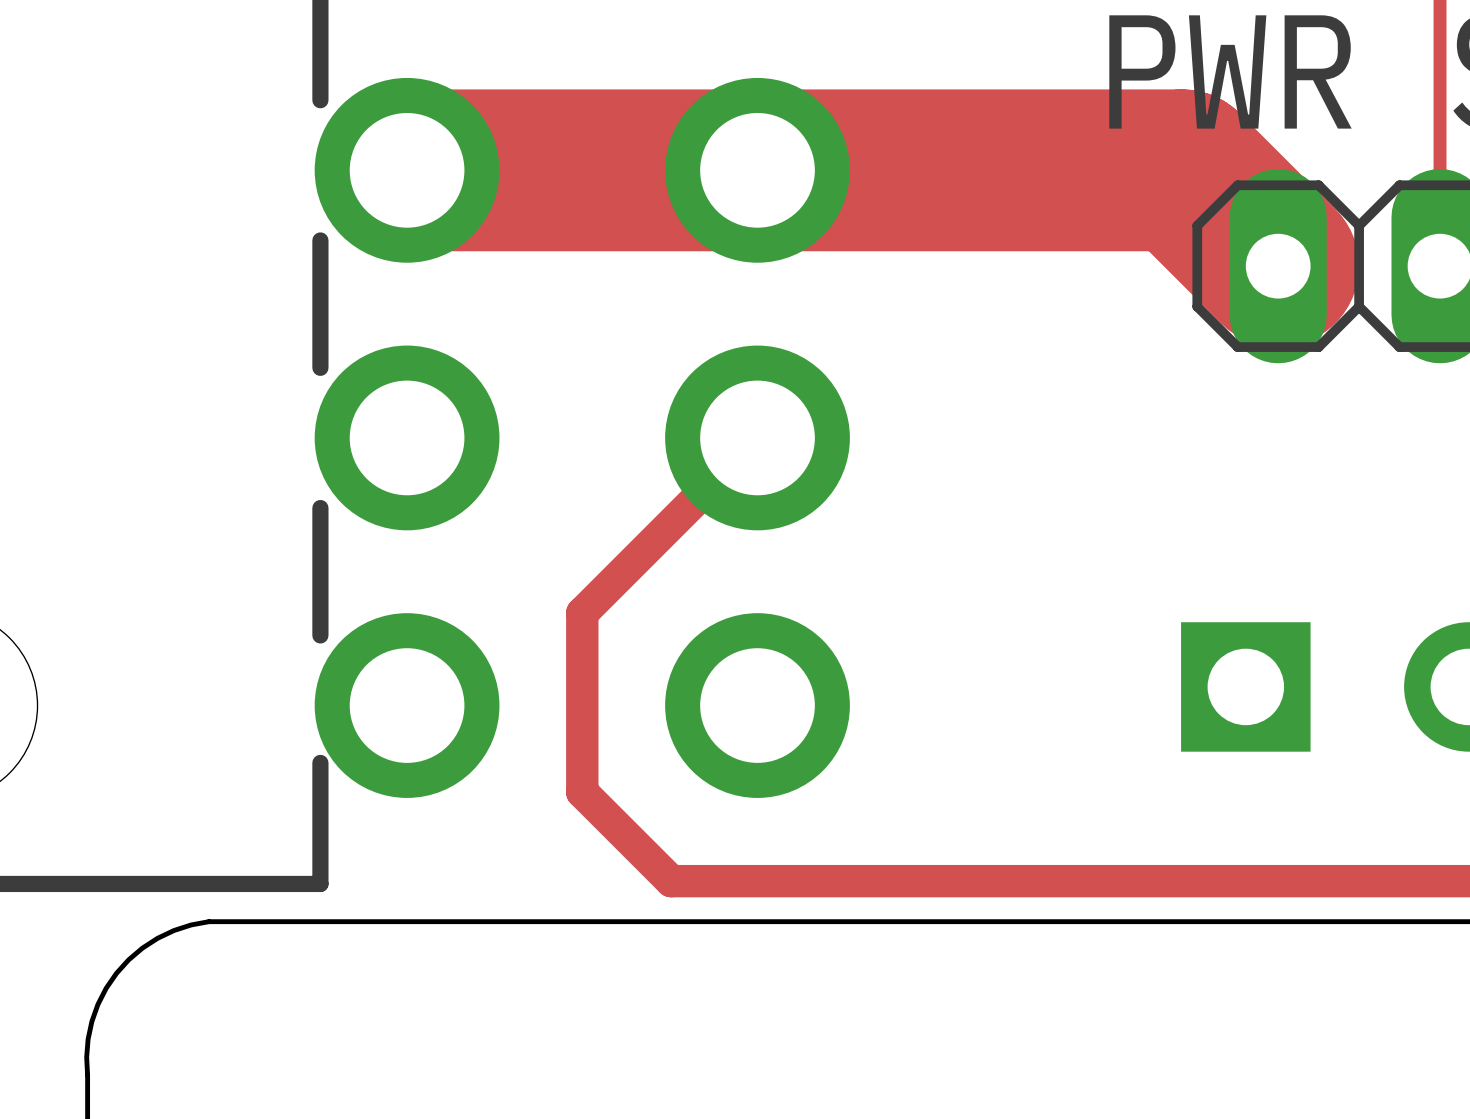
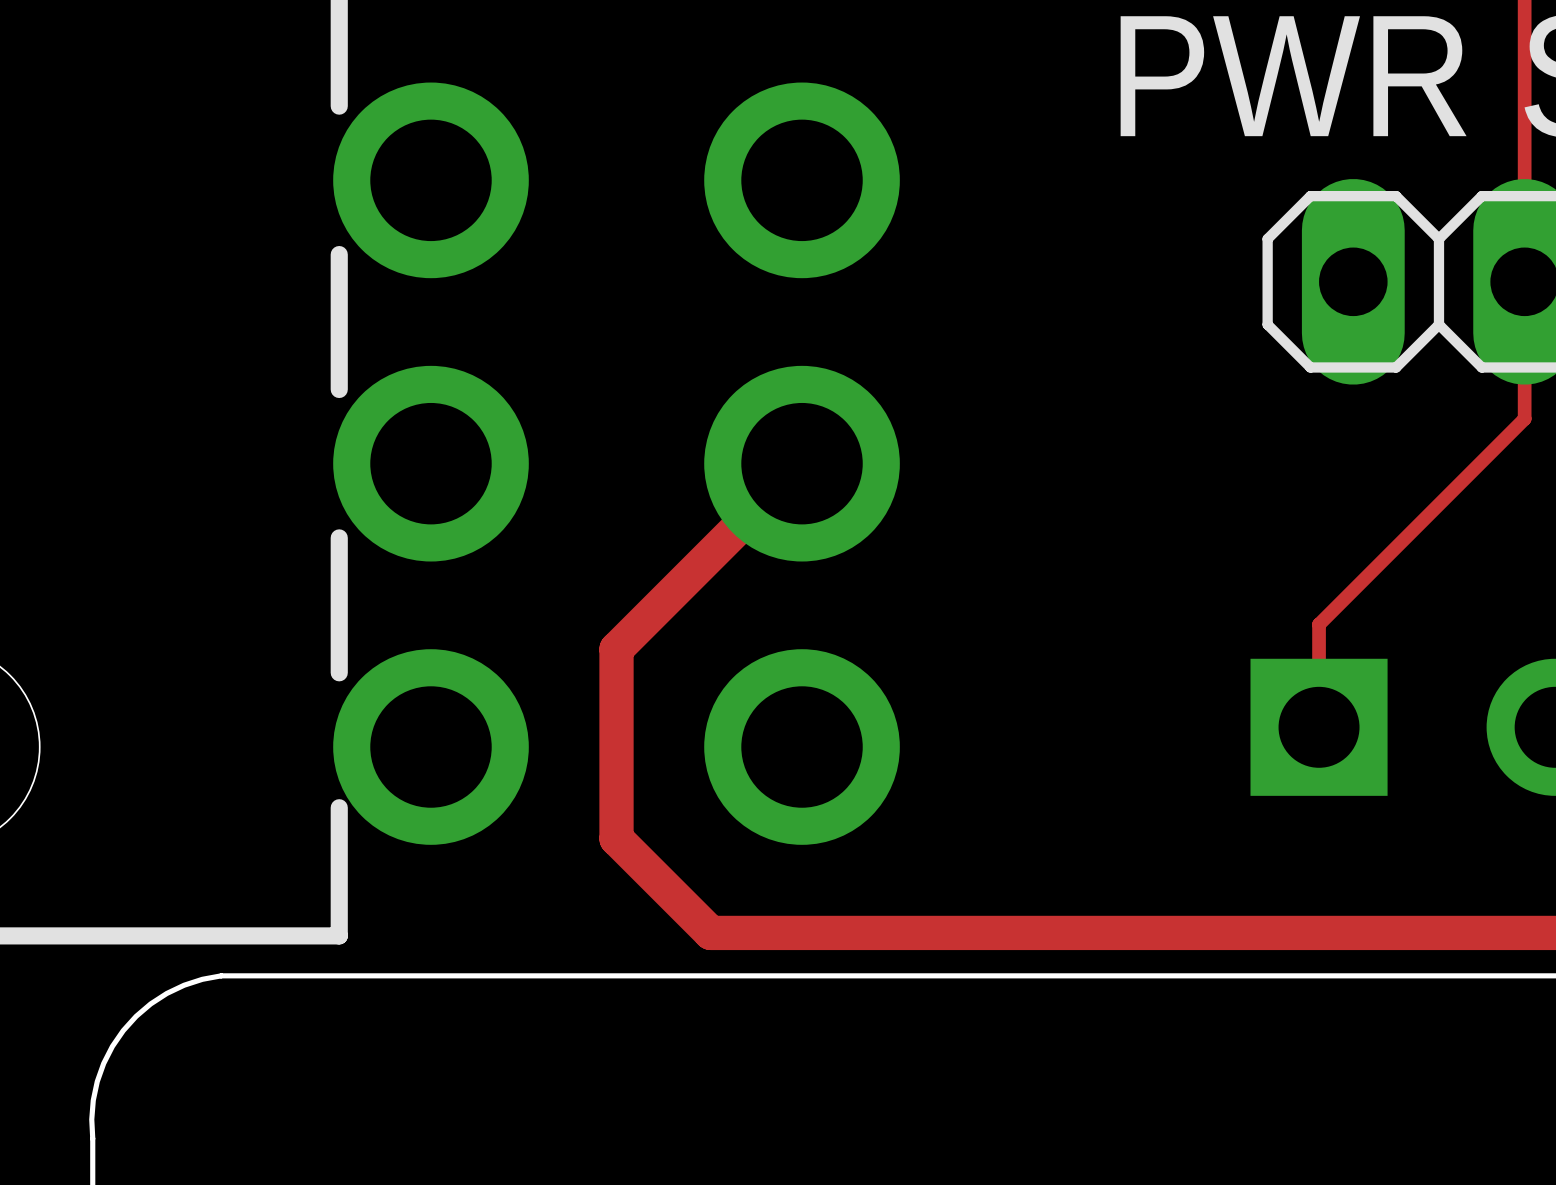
track: (407, 170) (1182, 170) (1278, 266) -> none
track: none -> (1524, 281) (1524, 418) (1319, 624) (1319, 727)

